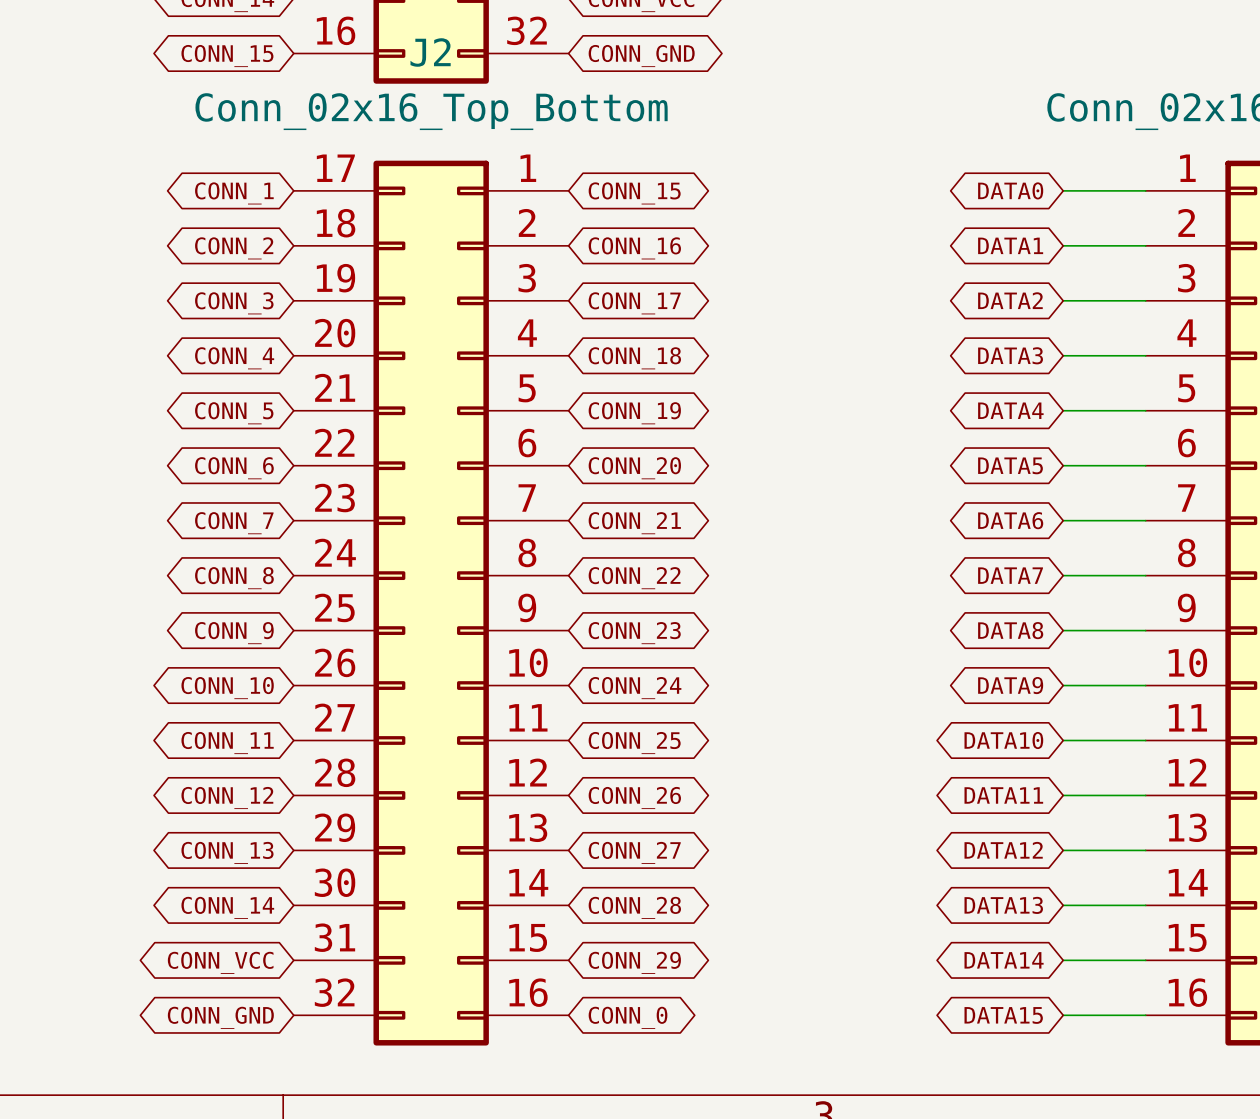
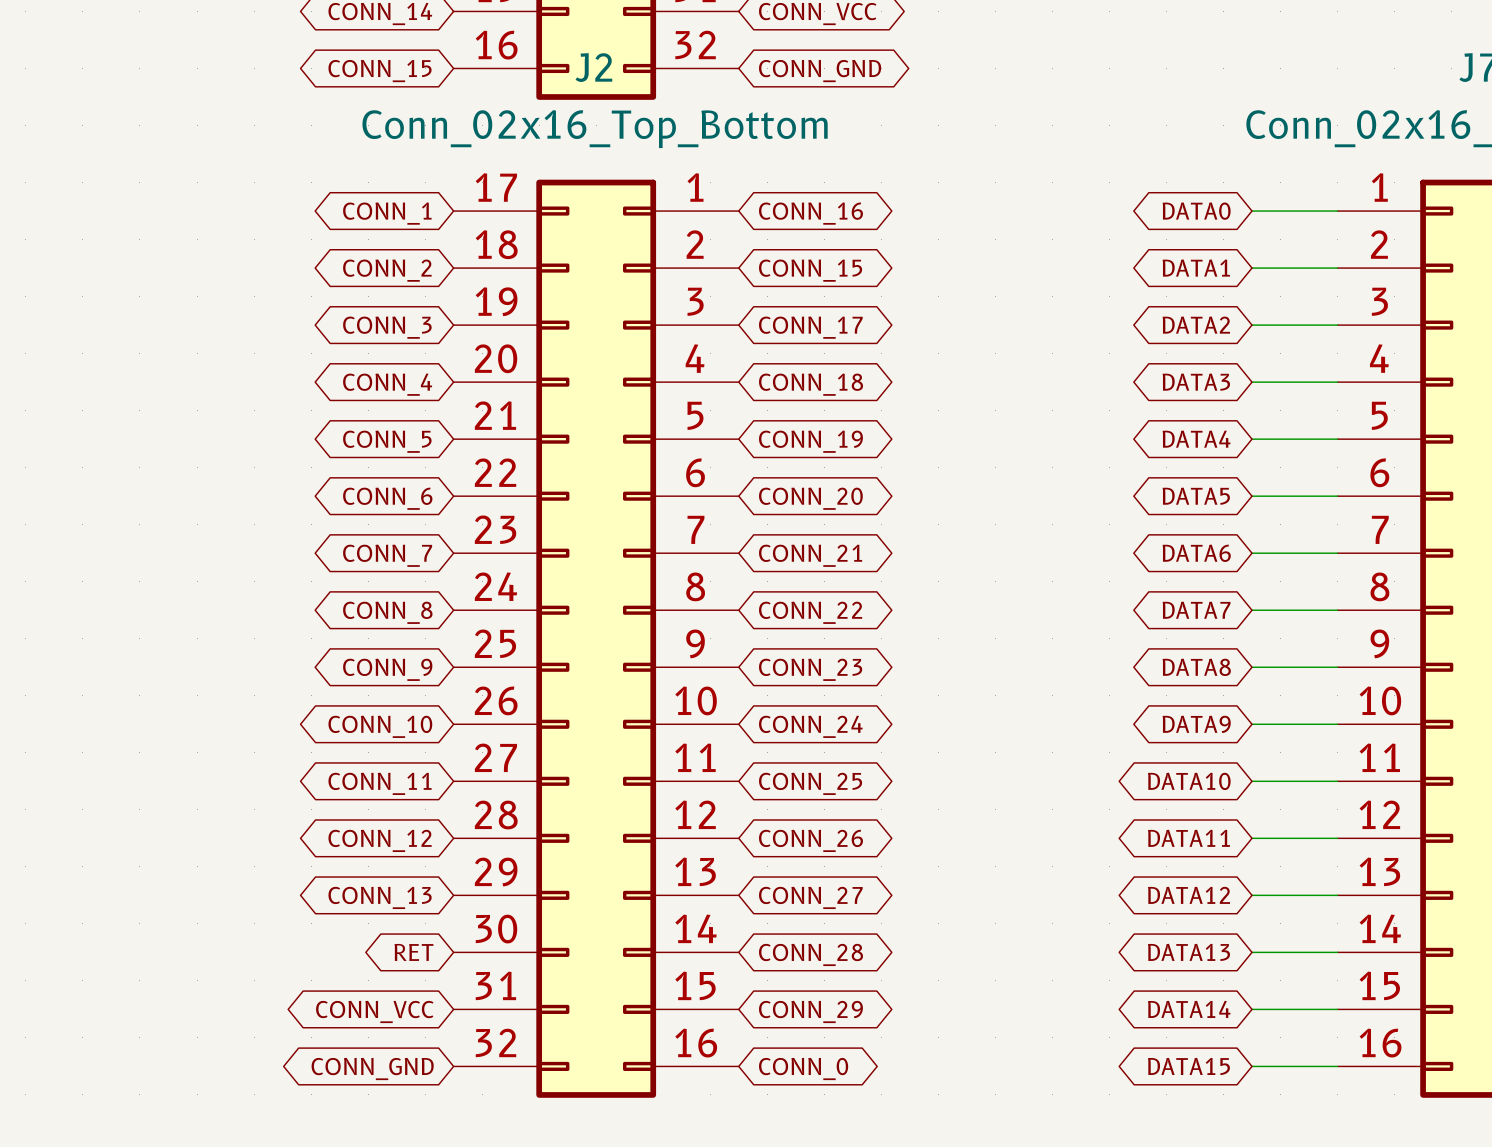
global label: CONN_15 (634, 193) -> CONN_16 (810, 213)
global label: CONN_16 (634, 248) -> CONN_15 (810, 270)
global label: CONN_14 (227, 907) -> RET (413, 952)

